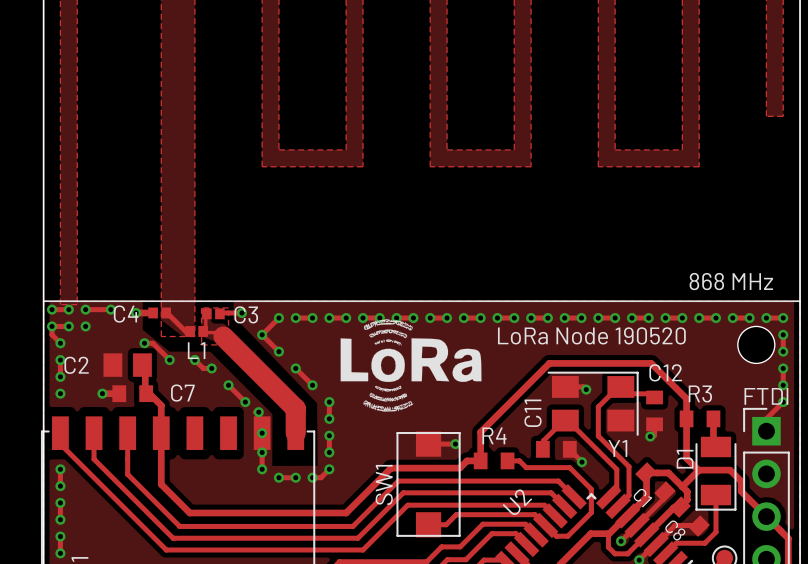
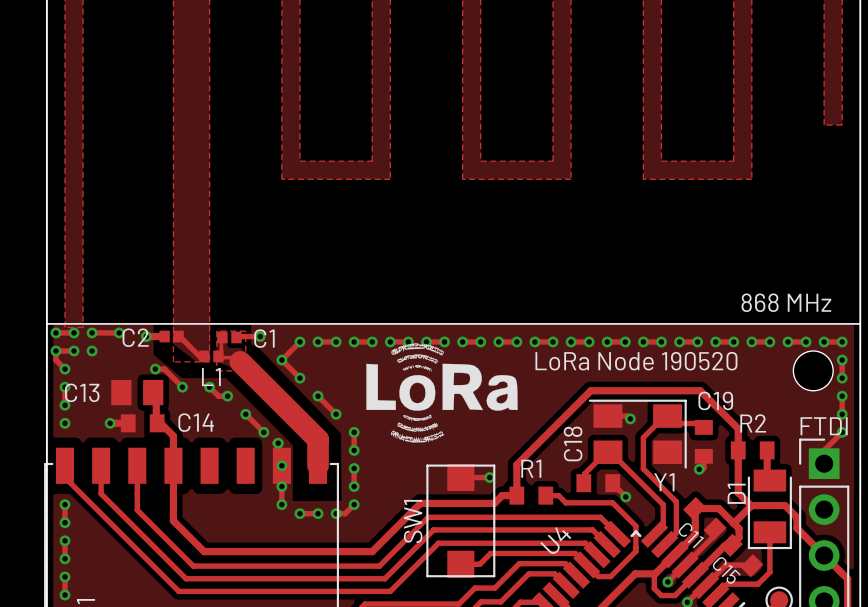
C4 name: C4 (126, 314) -> C2 (135, 337)
C3 name: C3 (246, 314) -> C1 (264, 338)
C2 name: C2 (76, 365) -> C13 (82, 392)
C12 name: C12 (665, 372) -> C19 (715, 400)
C7 name: C7 (182, 393) -> C14 (196, 422)
R3 name: R3 (700, 393) -> R2 (753, 423)
C11 name: C11 (532, 413) -> C18 (573, 443)
R4 name: R4 (494, 435) -> R1 (531, 468)
C1 name: C1 (642, 498) -> C11 (691, 535)
U2 name: U2 (517, 502) -> U4 (555, 540)
C8 name: C8 (675, 530) -> C15 (726, 570)

